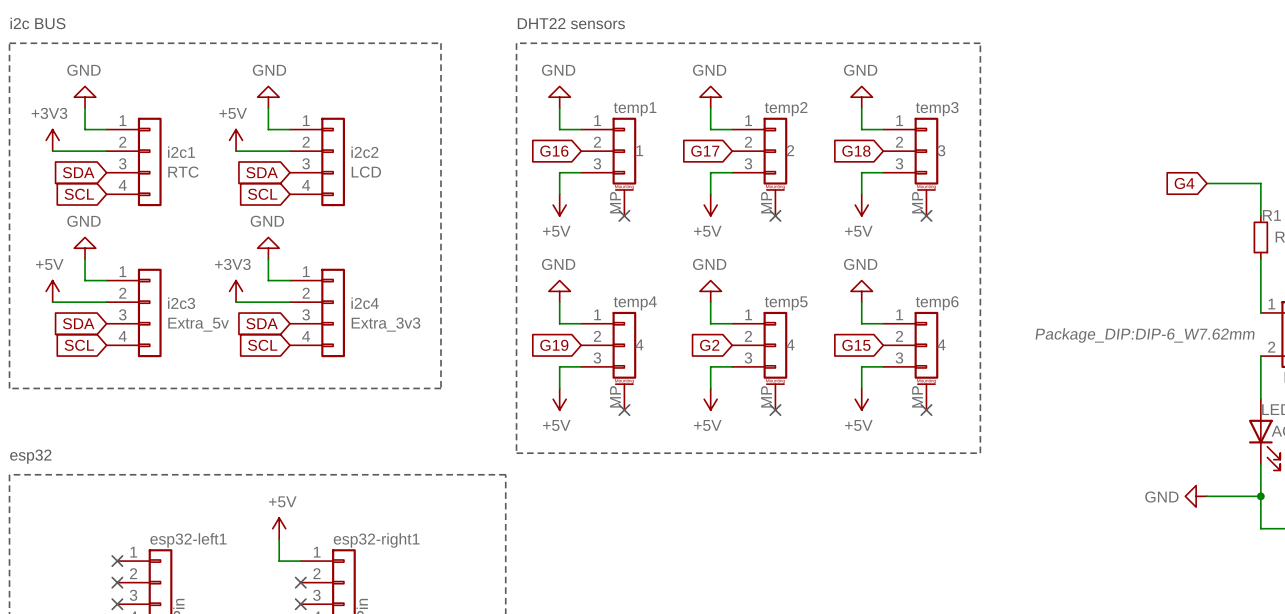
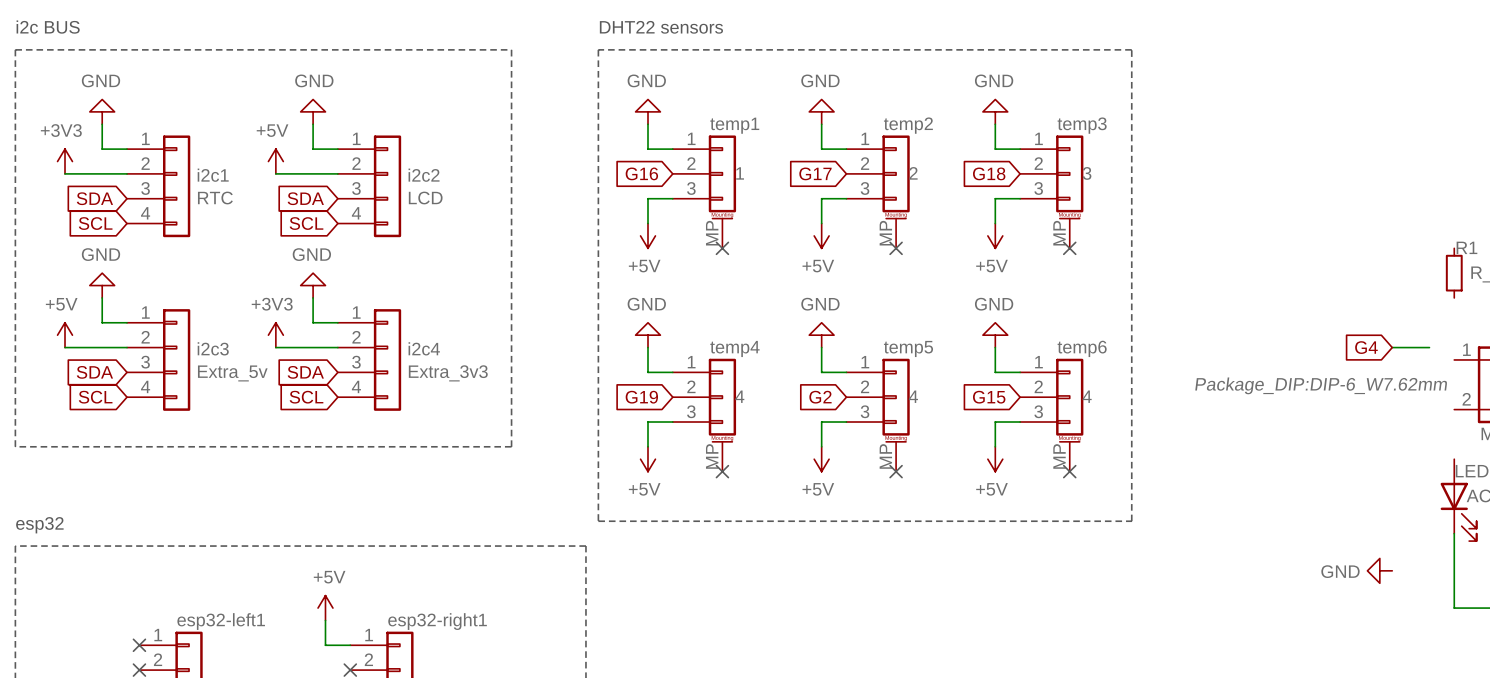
global label position: G4 (1184, 183) -> G4 (1366, 347)
wire: (1206, 183) (1260, 183) (1260, 215) -> none
wire: (1260, 259) (1260, 312) -> none
wire: none -> (1392, 347) (1429, 347)
wire: (1260, 356) (1260, 399) -> none
wire: (1206, 496) (1260, 496) -> none
junction: (1260, 496) -> none

